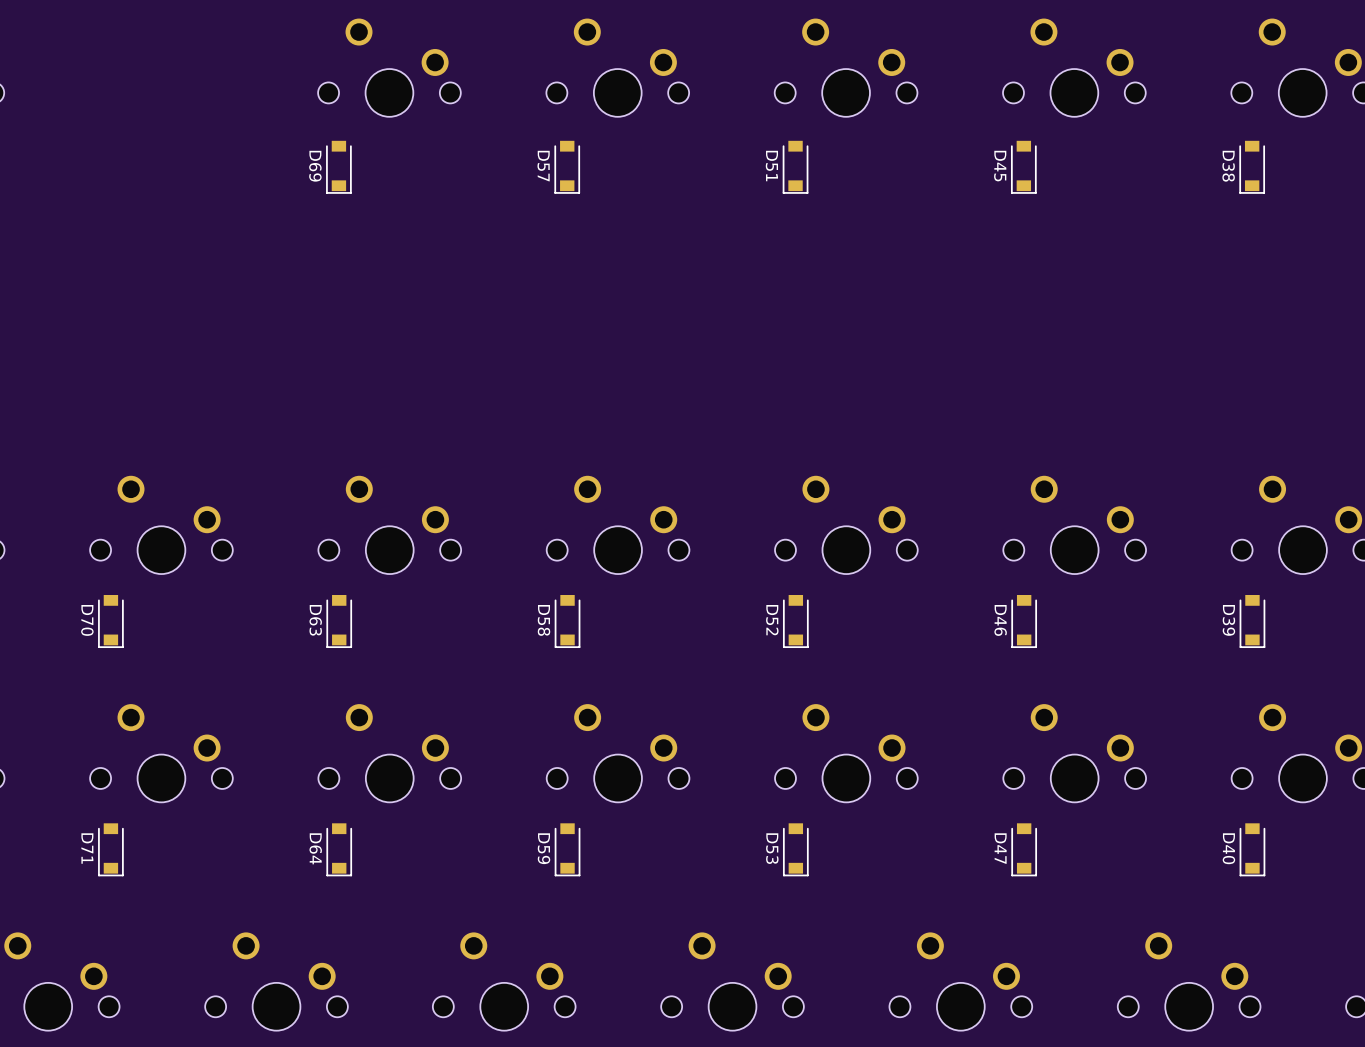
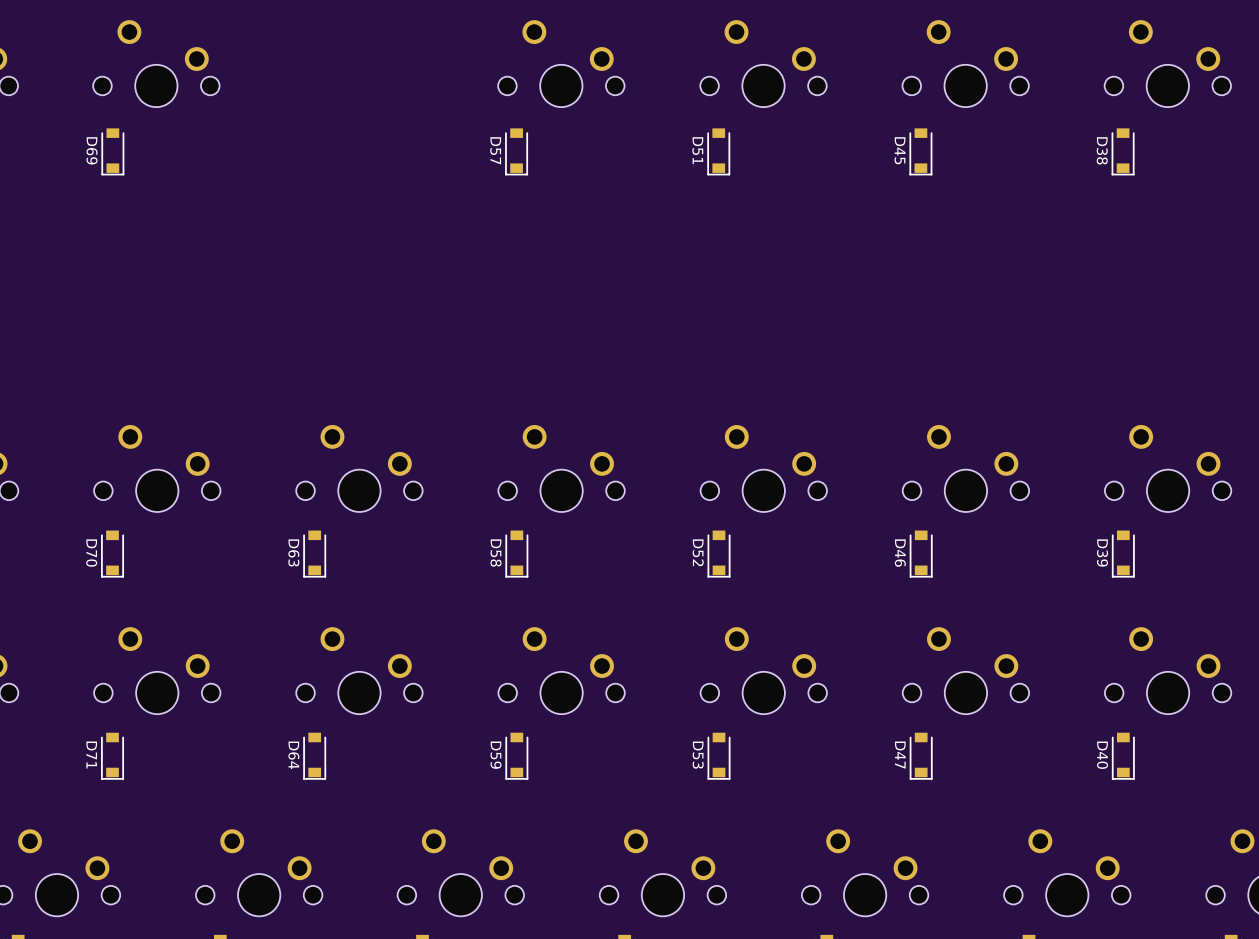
part position: (389, 67) -> (156, 63)
D69 position: (338, 167) -> (112, 151)

